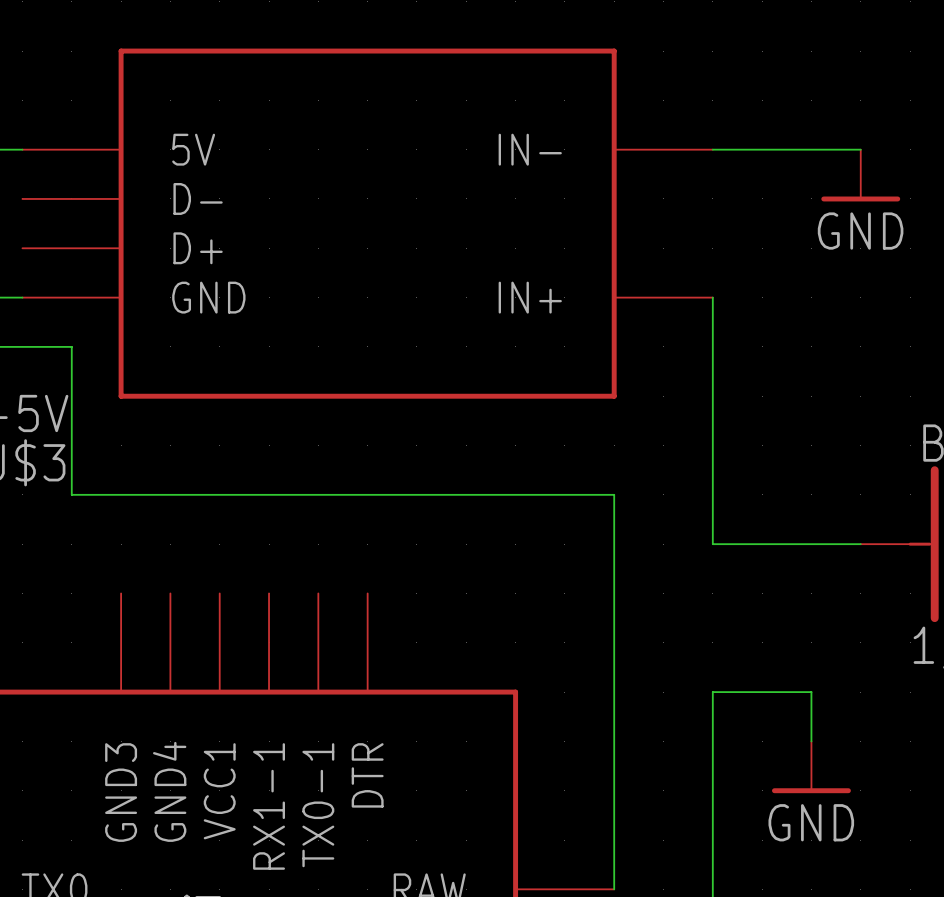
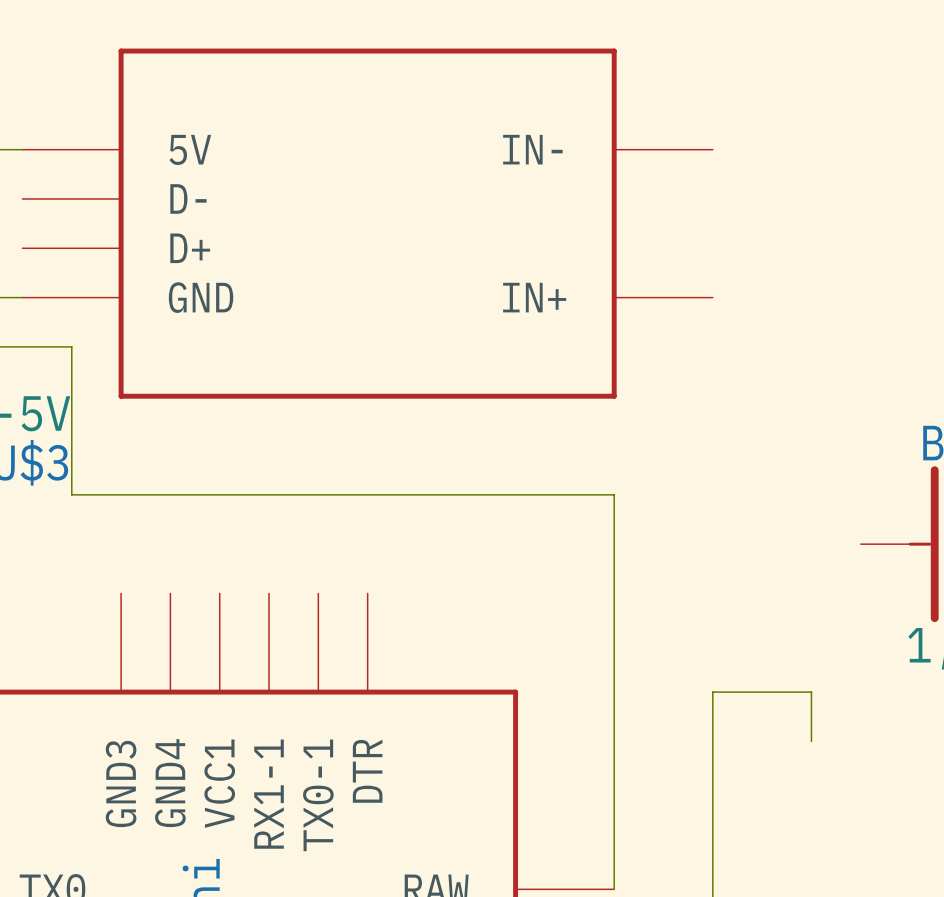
wire: (712, 149) (860, 149) -> none
power symbol: GND (860, 175) -> none
wire: (712, 297) (712, 544) (860, 544) -> none
power symbol: GND (811, 767) -> none

